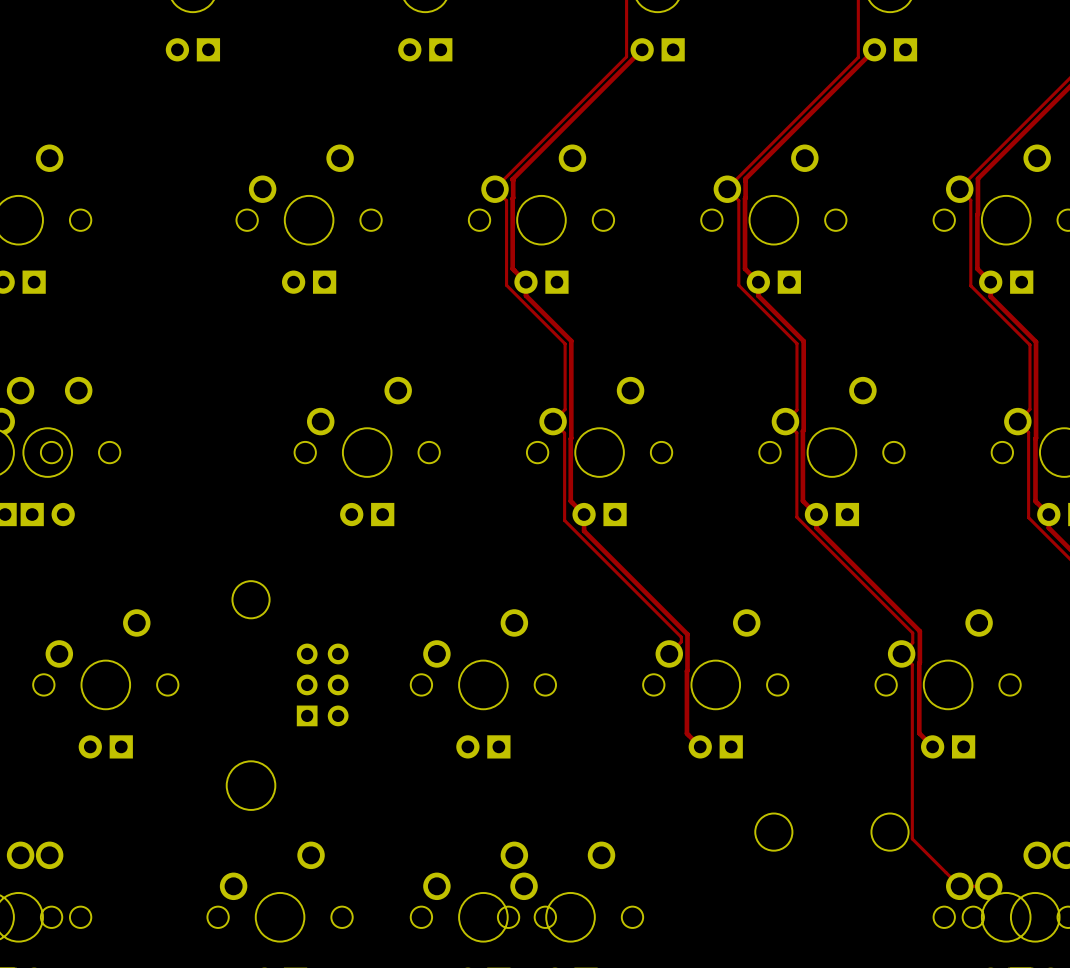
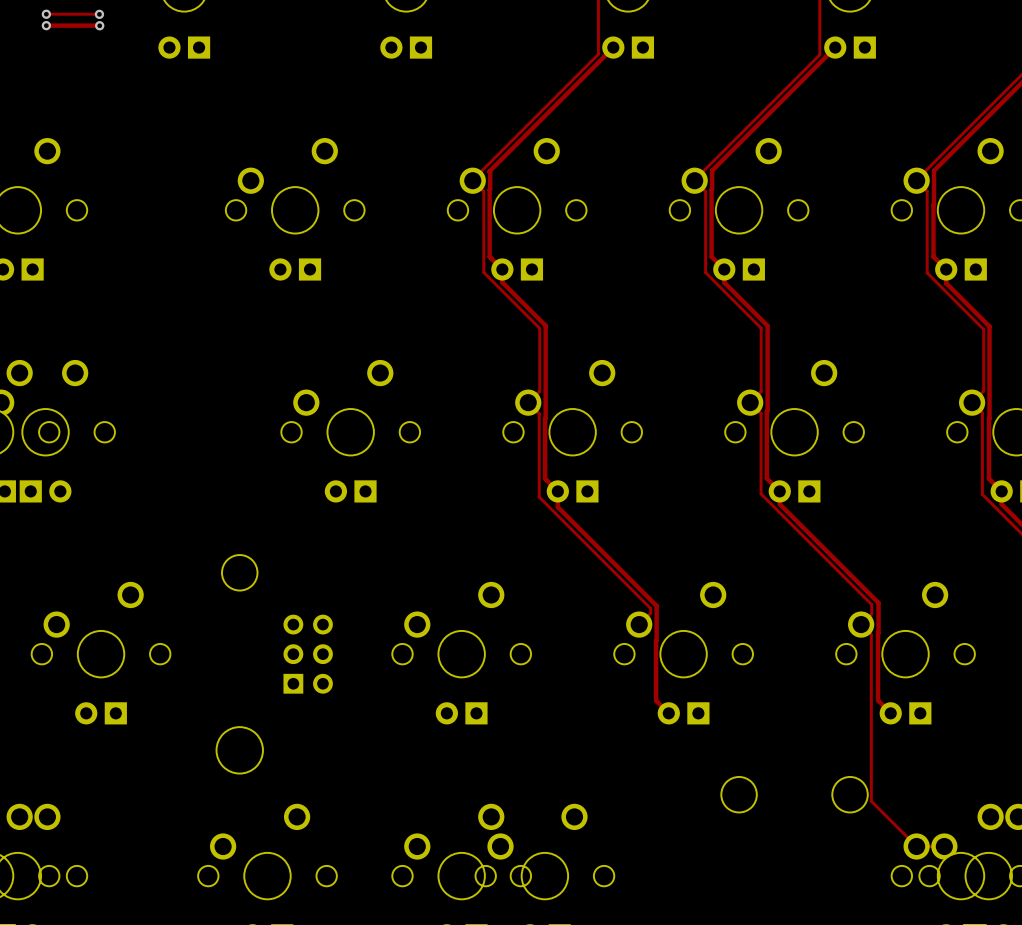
track: none -> (46, 14) (99, 14)
via: none -> (46, 14)
via: none -> (99, 14)
track: none -> (46, 25) (99, 25)
via: none -> (46, 25)
via: none -> (99, 25)

